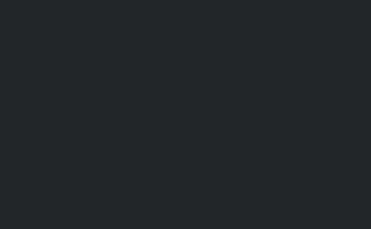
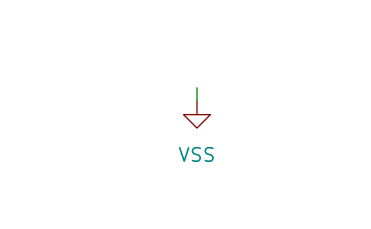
wire: none -> (196, 87) (196, 101)
power symbol: none -> VSS (196, 114)

